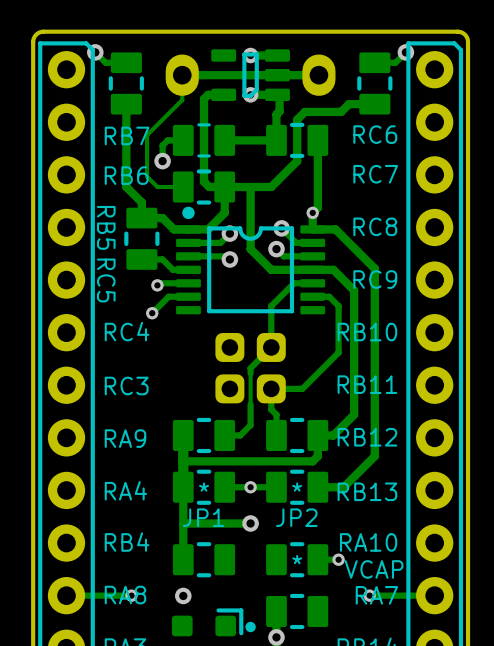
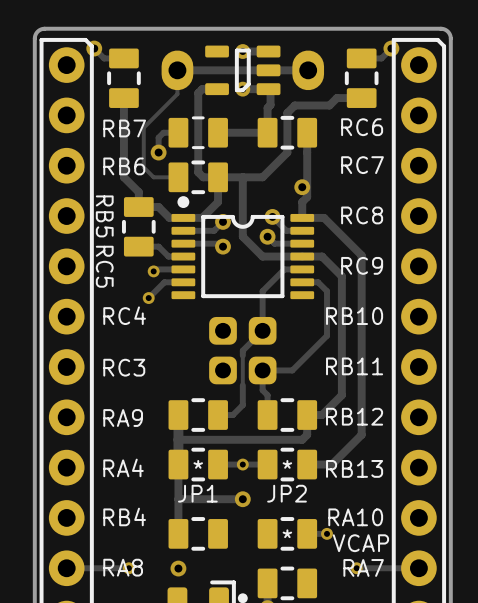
via: none -> (302, 187)
via: (312, 212) -> none

